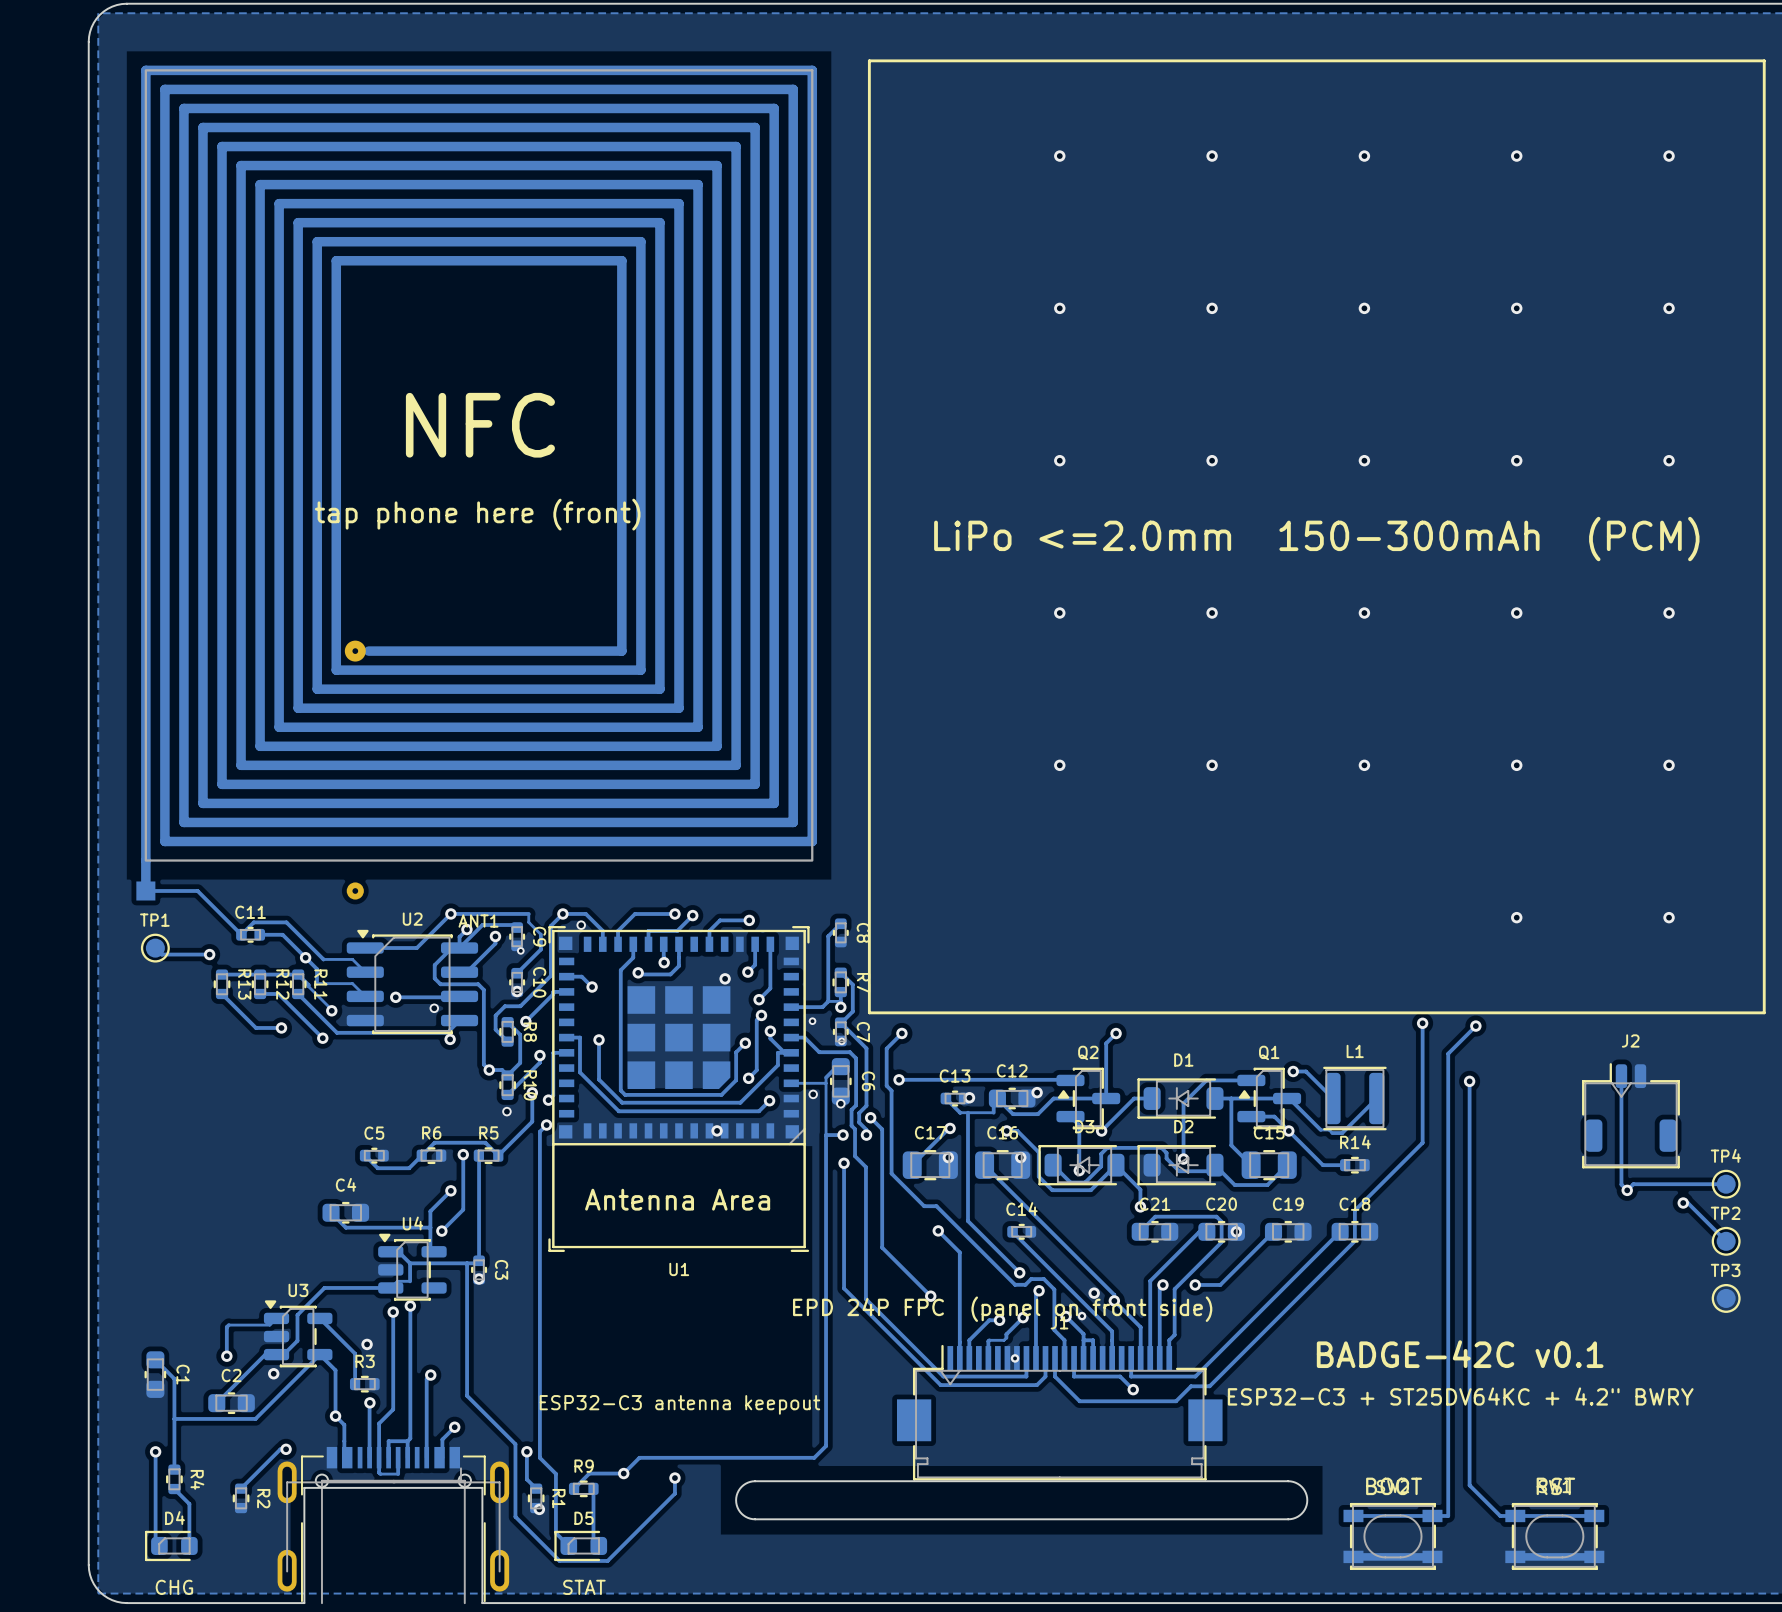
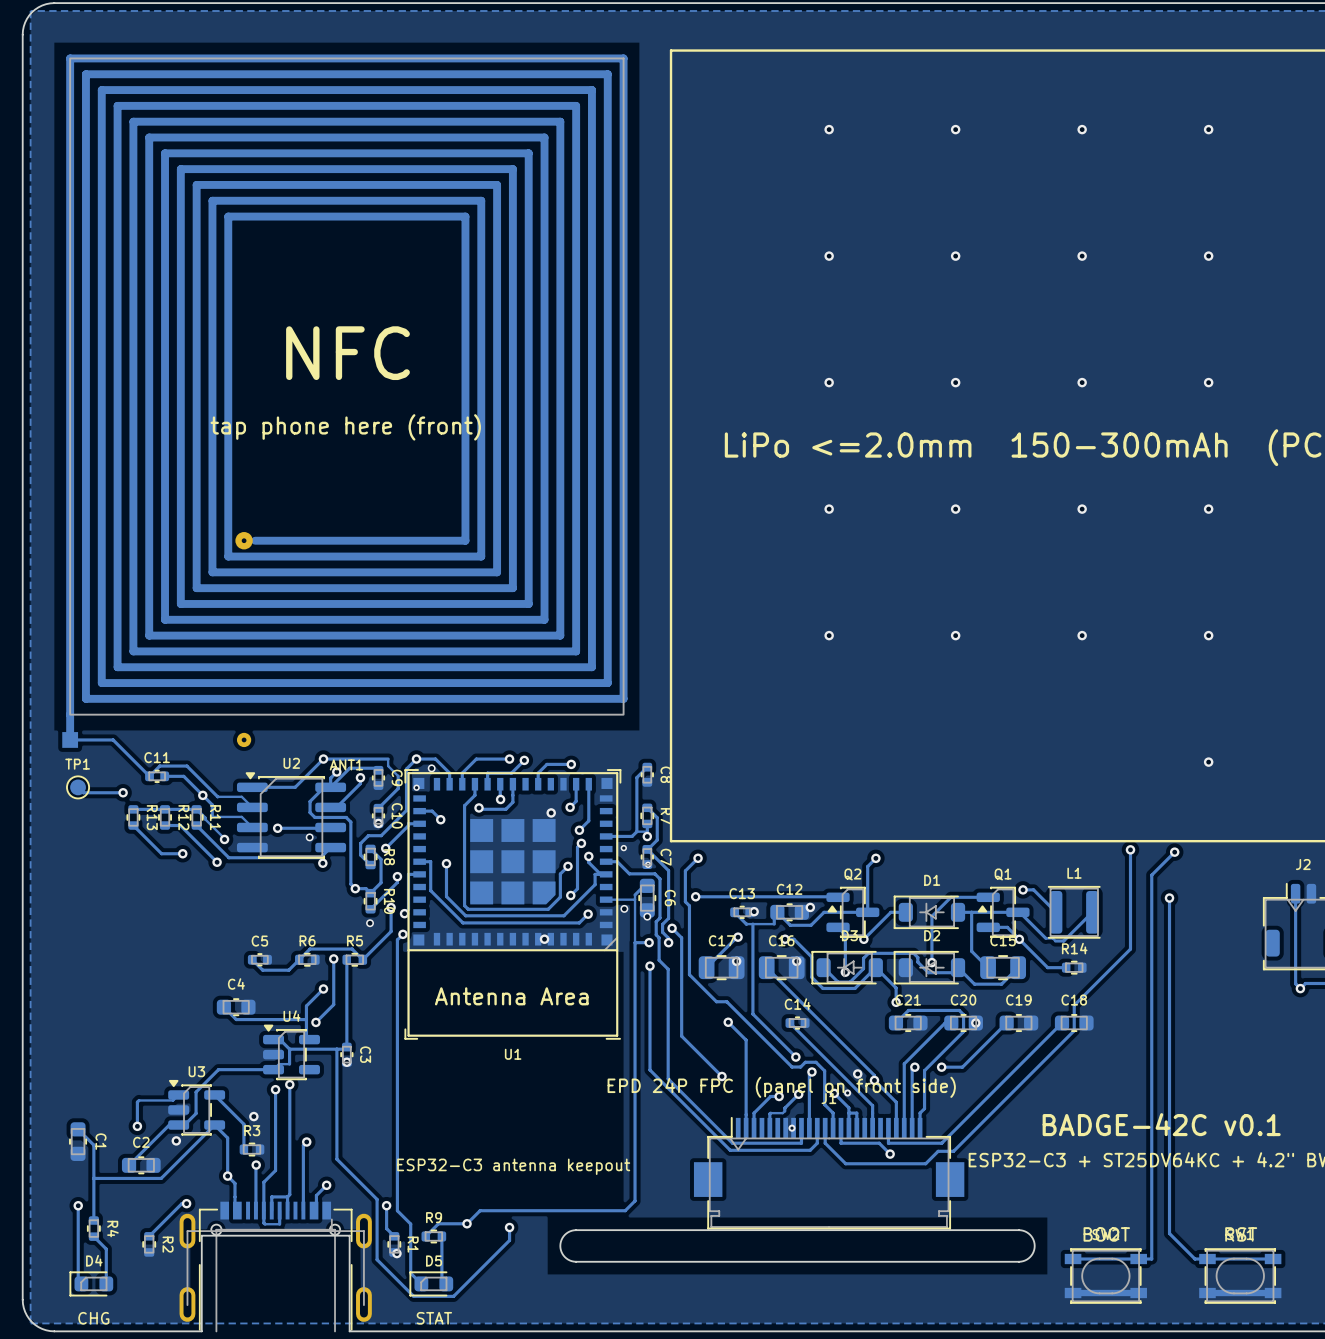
via position: (520, 950) -> (416, 787)

